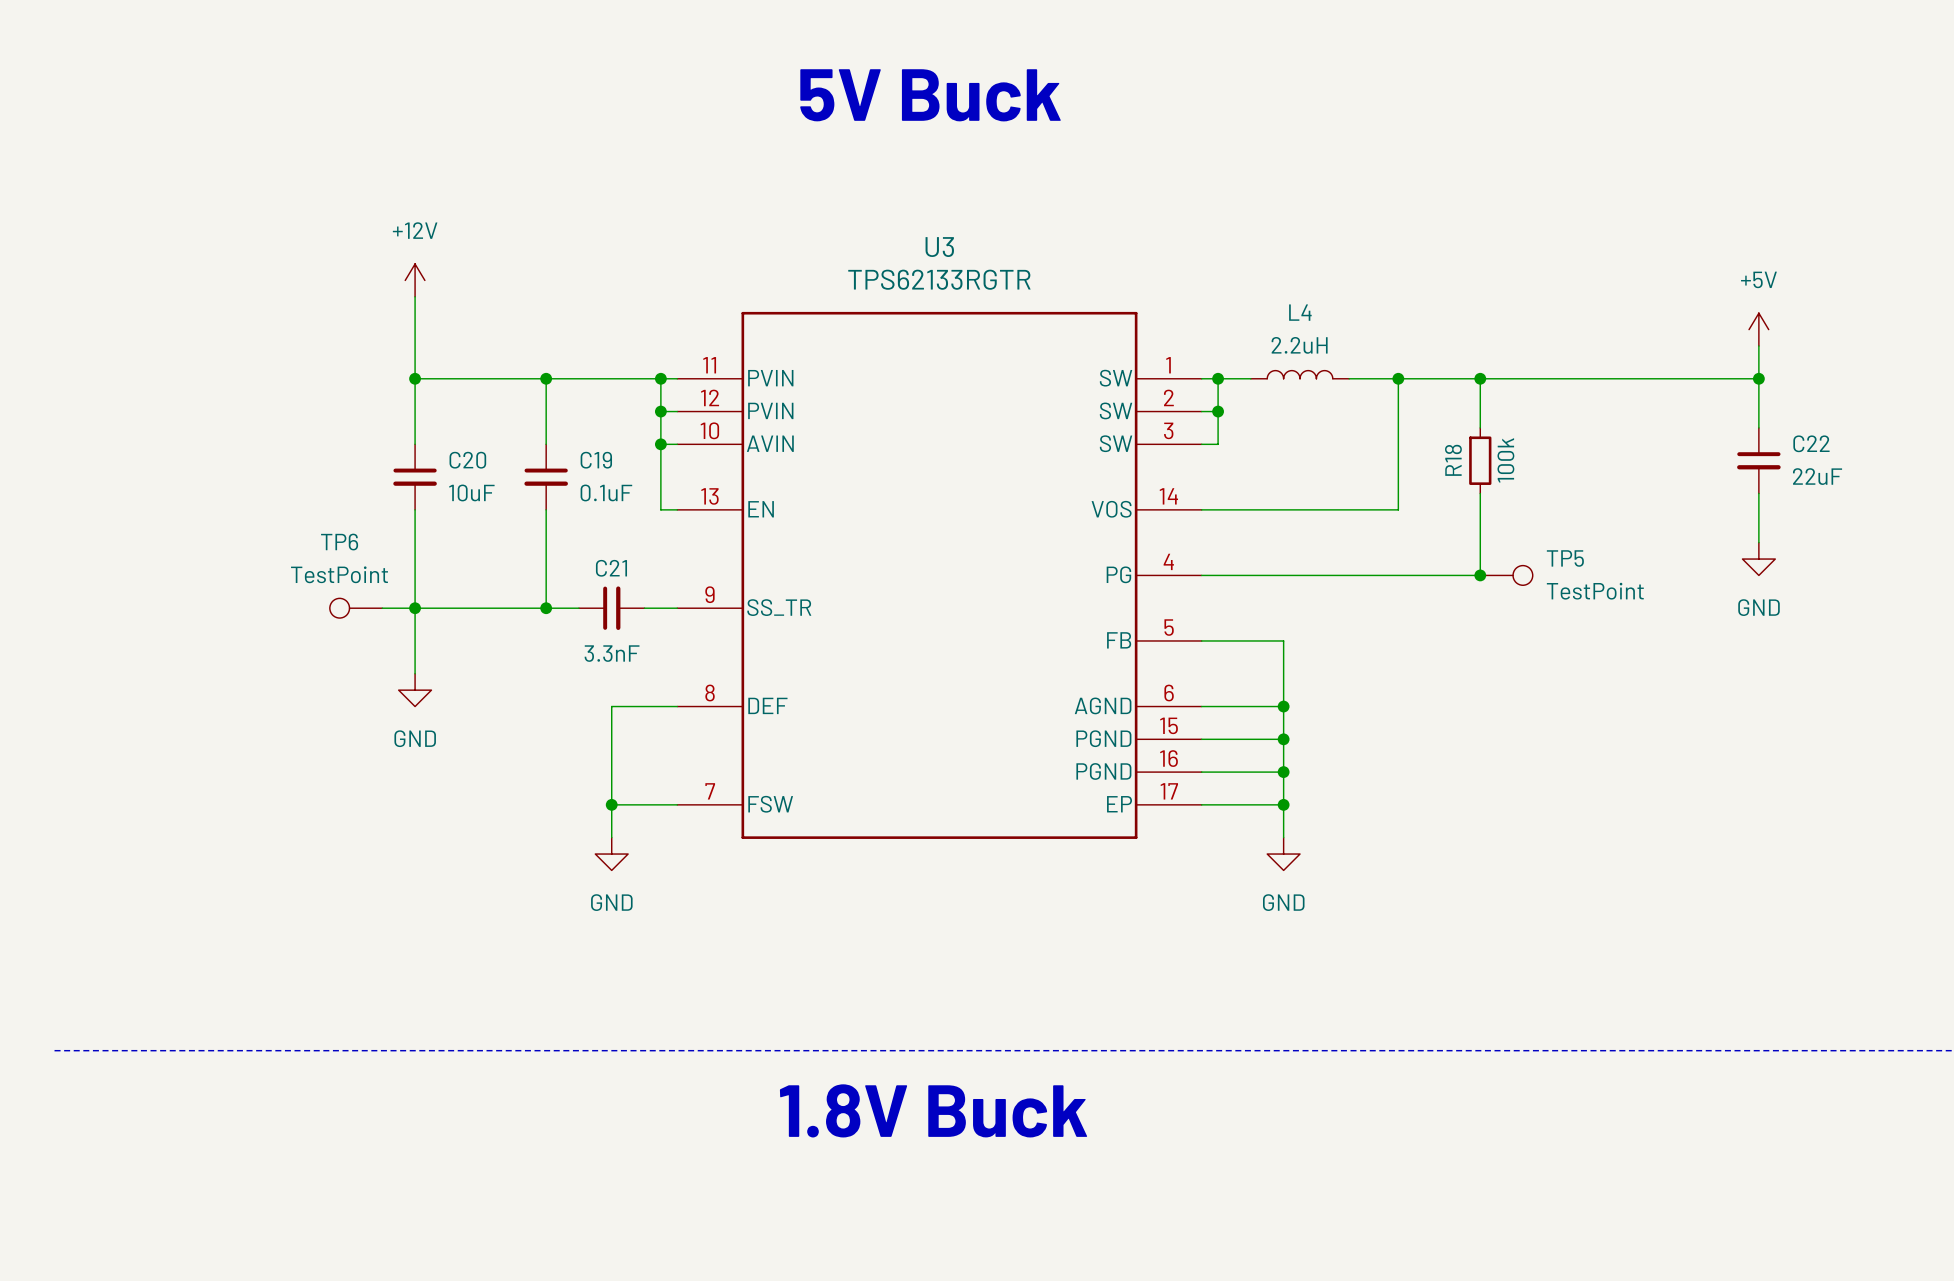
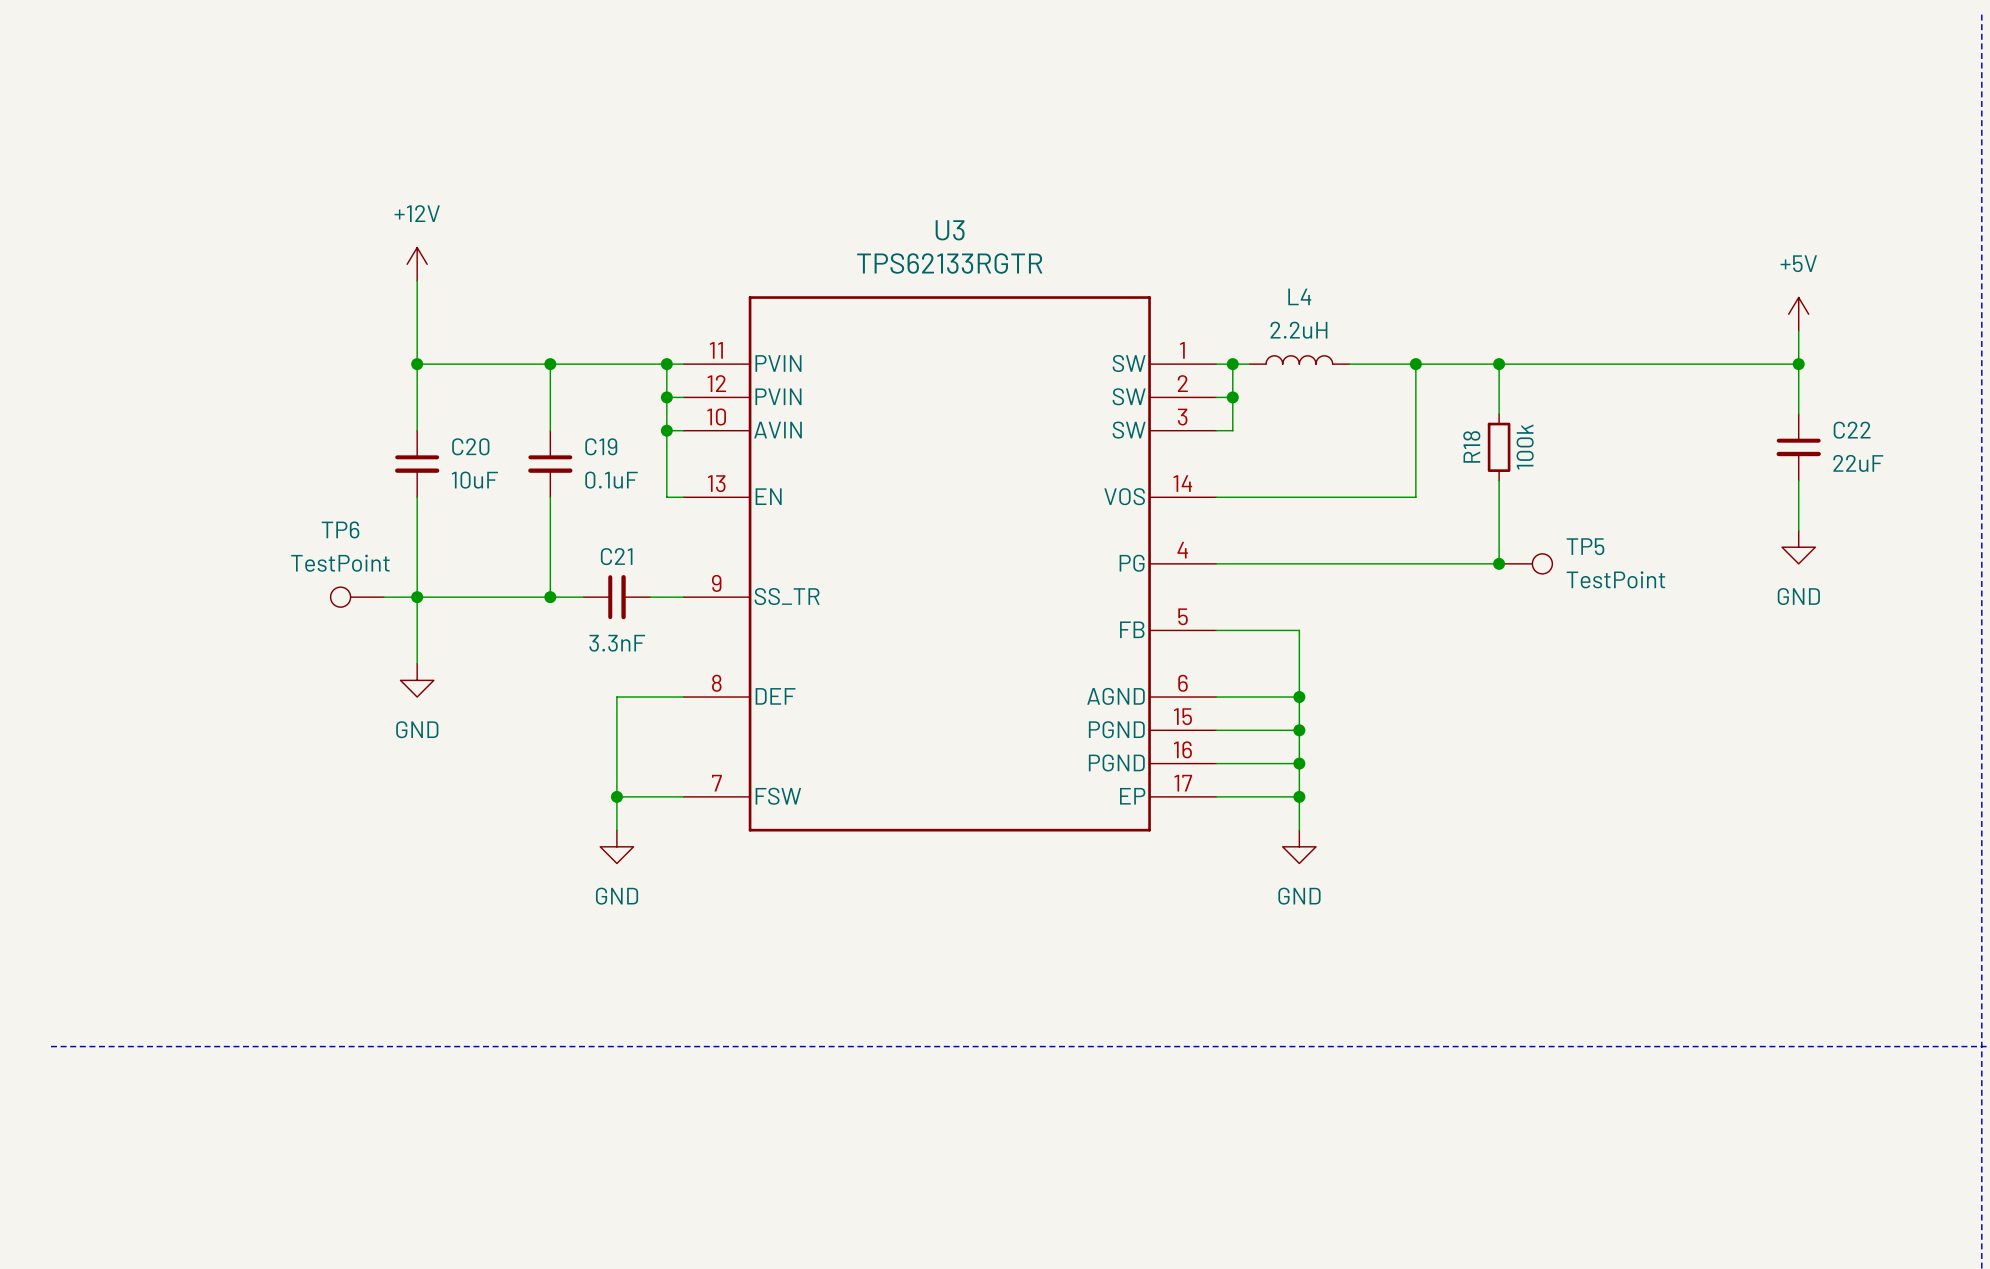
text: 5V Buck (930, 95) -> none
power symbol position: +5V (1758, 329) -> +5V (1798, 314)
wire: (1758, 346) (1758, 427) -> (1798, 330) (1798, 414)
L4 position: (1300, 374) -> (1299, 359)
wire: none -> (1782, 364) (1798, 364)
junction position: (1758, 378) -> (1798, 364)
C22 position: (1758, 460) -> (1798, 447)
wire: (1758, 493) (1758, 542) -> (1798, 480) (1798, 530)
power symbol position: GND (1758, 559) -> GND (1798, 547)
text: 1.8V Buck (933, 1110) -> none

